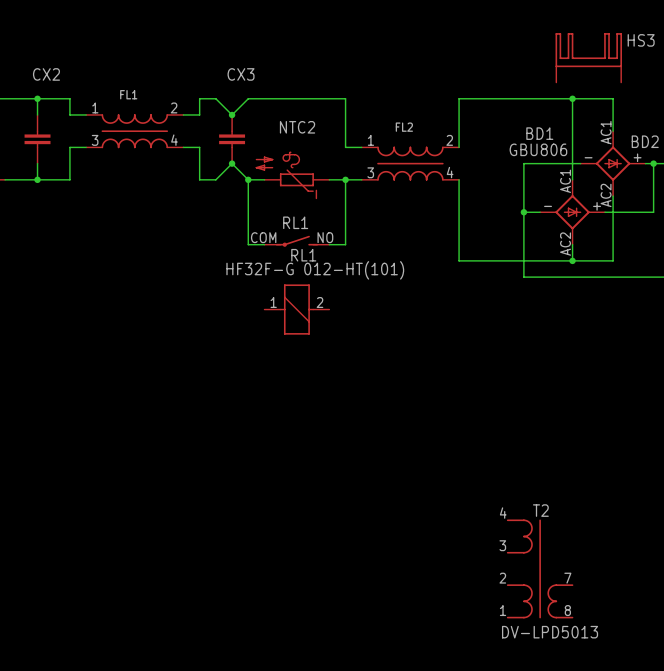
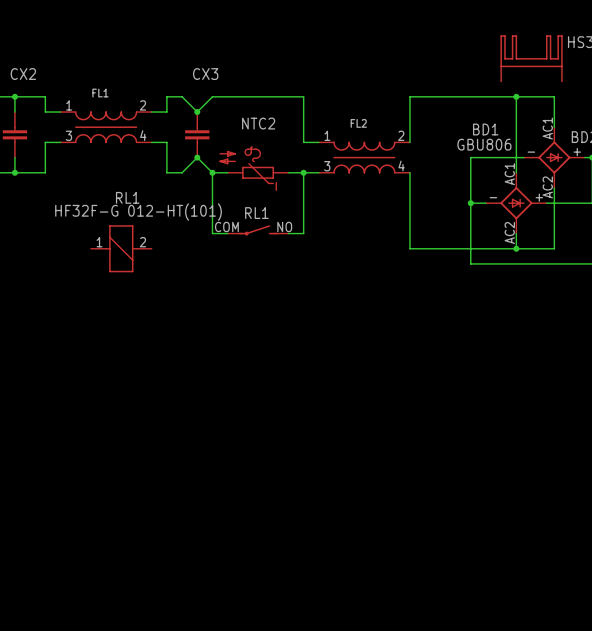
RL1 position: (296, 309) -> (121, 248)
T2: DV-LPD5013 (540, 568) -> none

